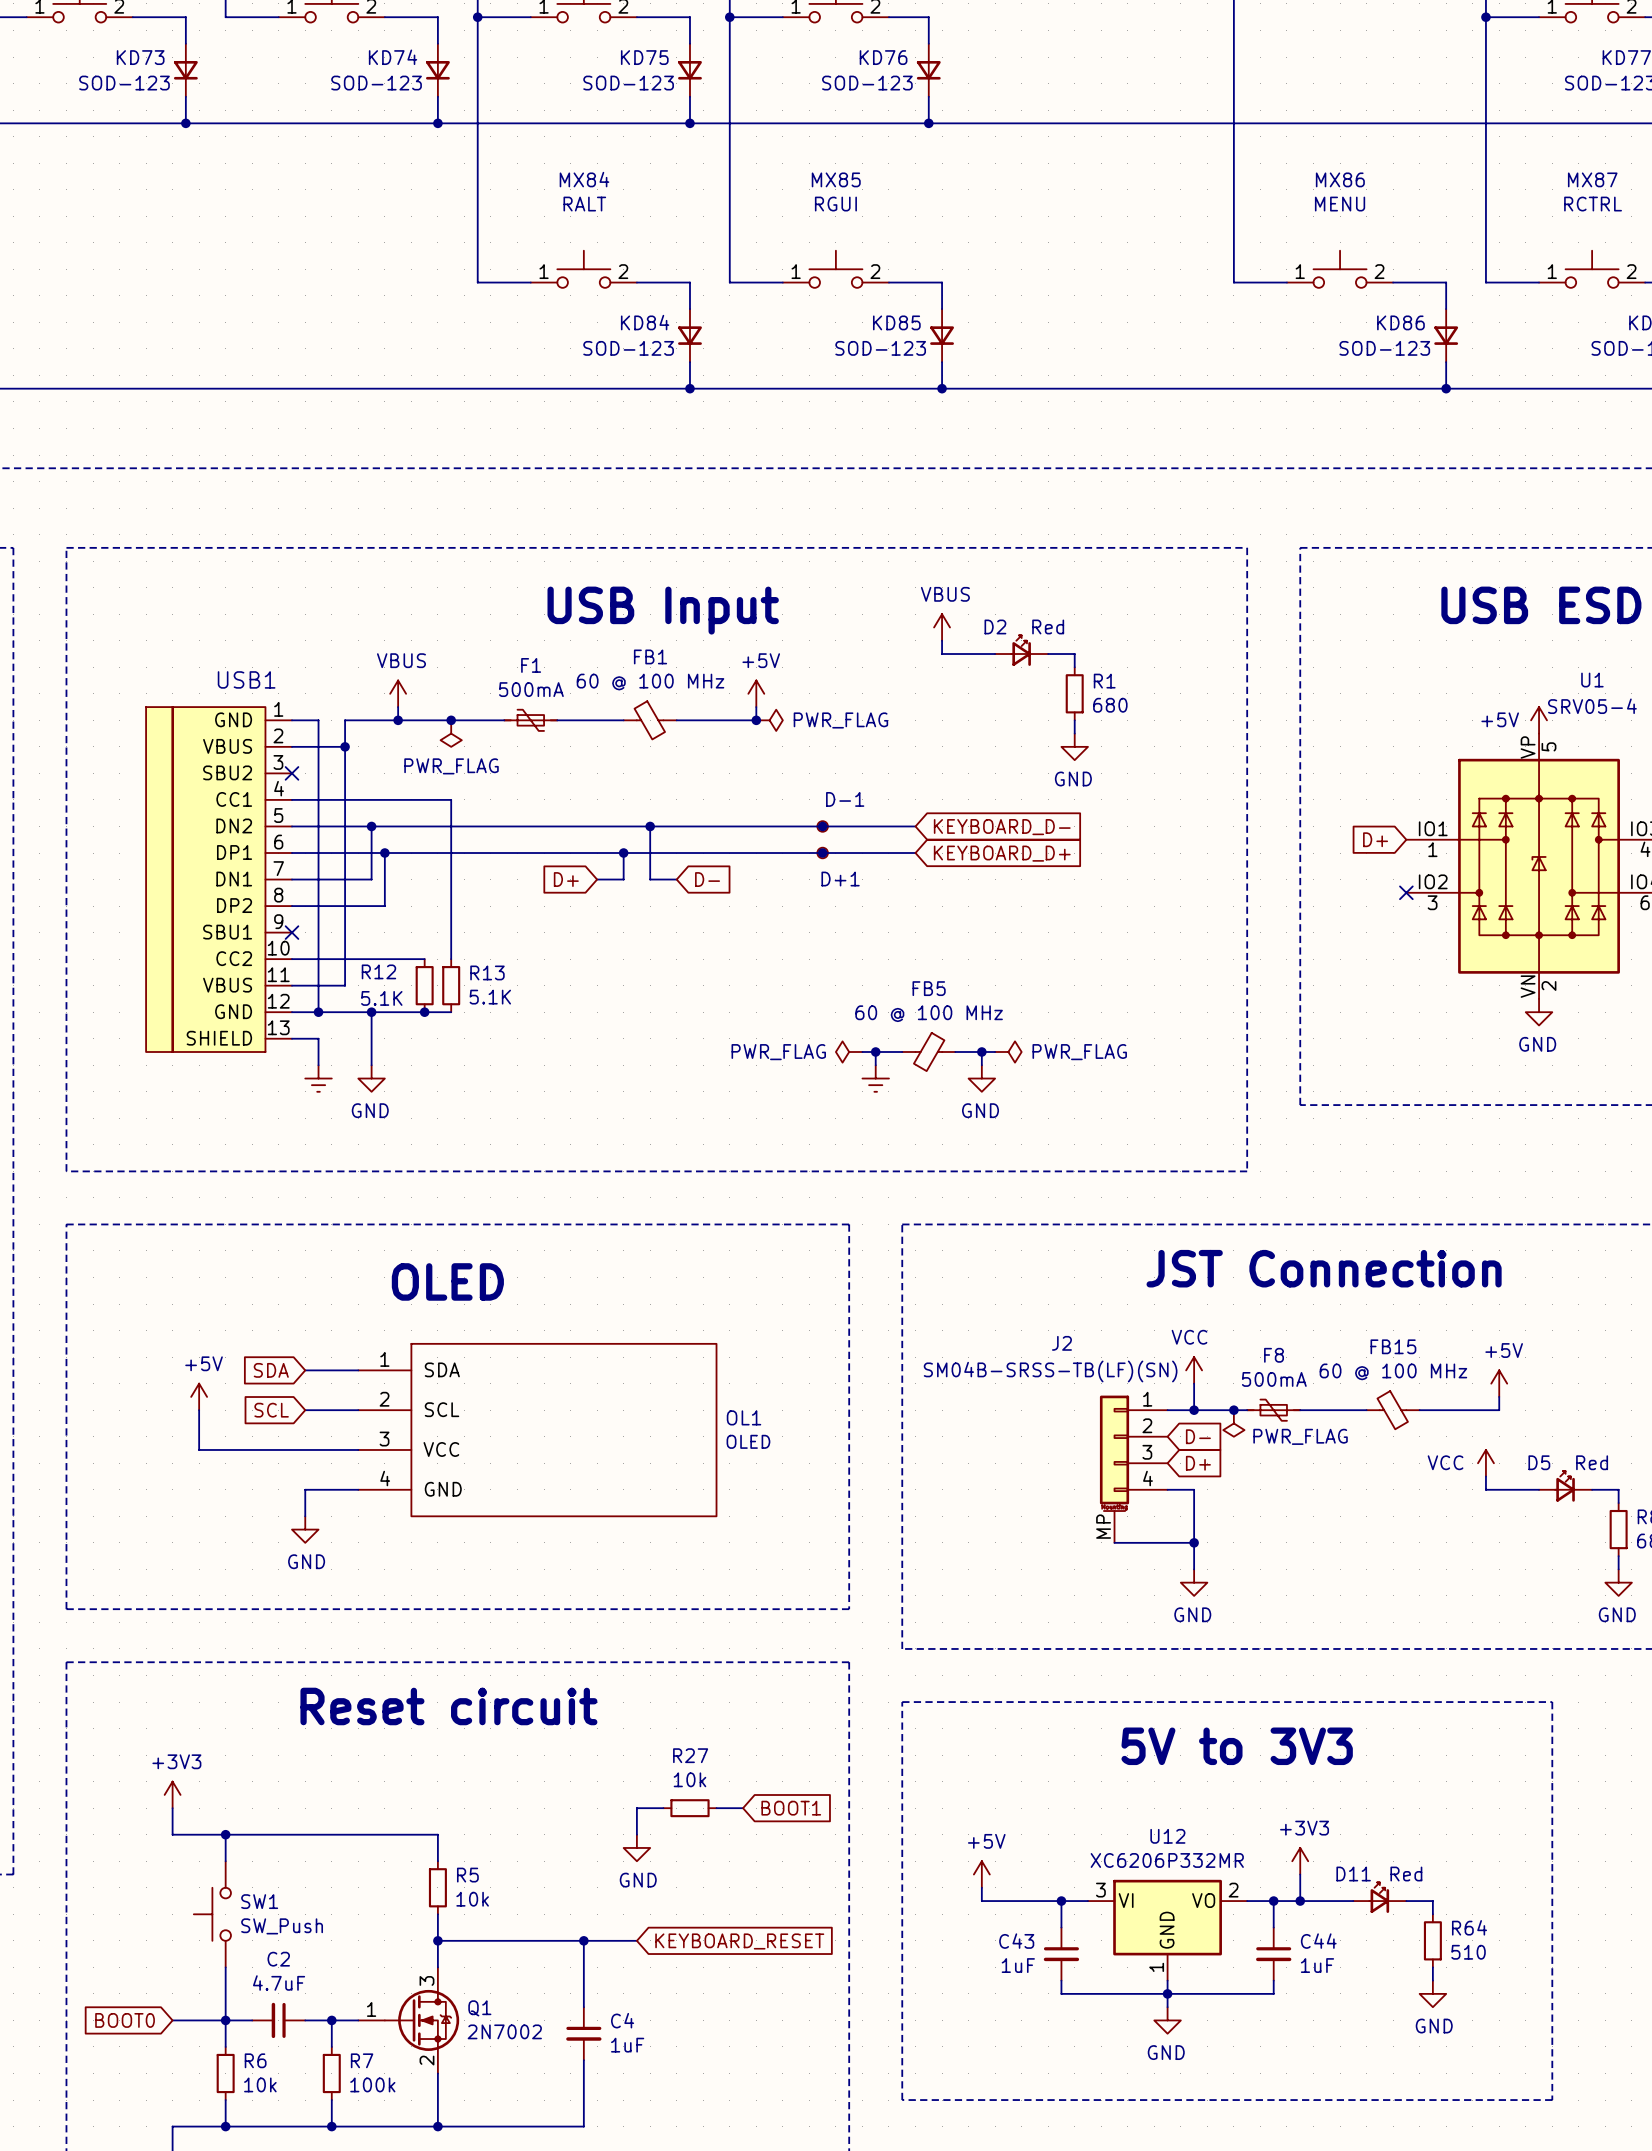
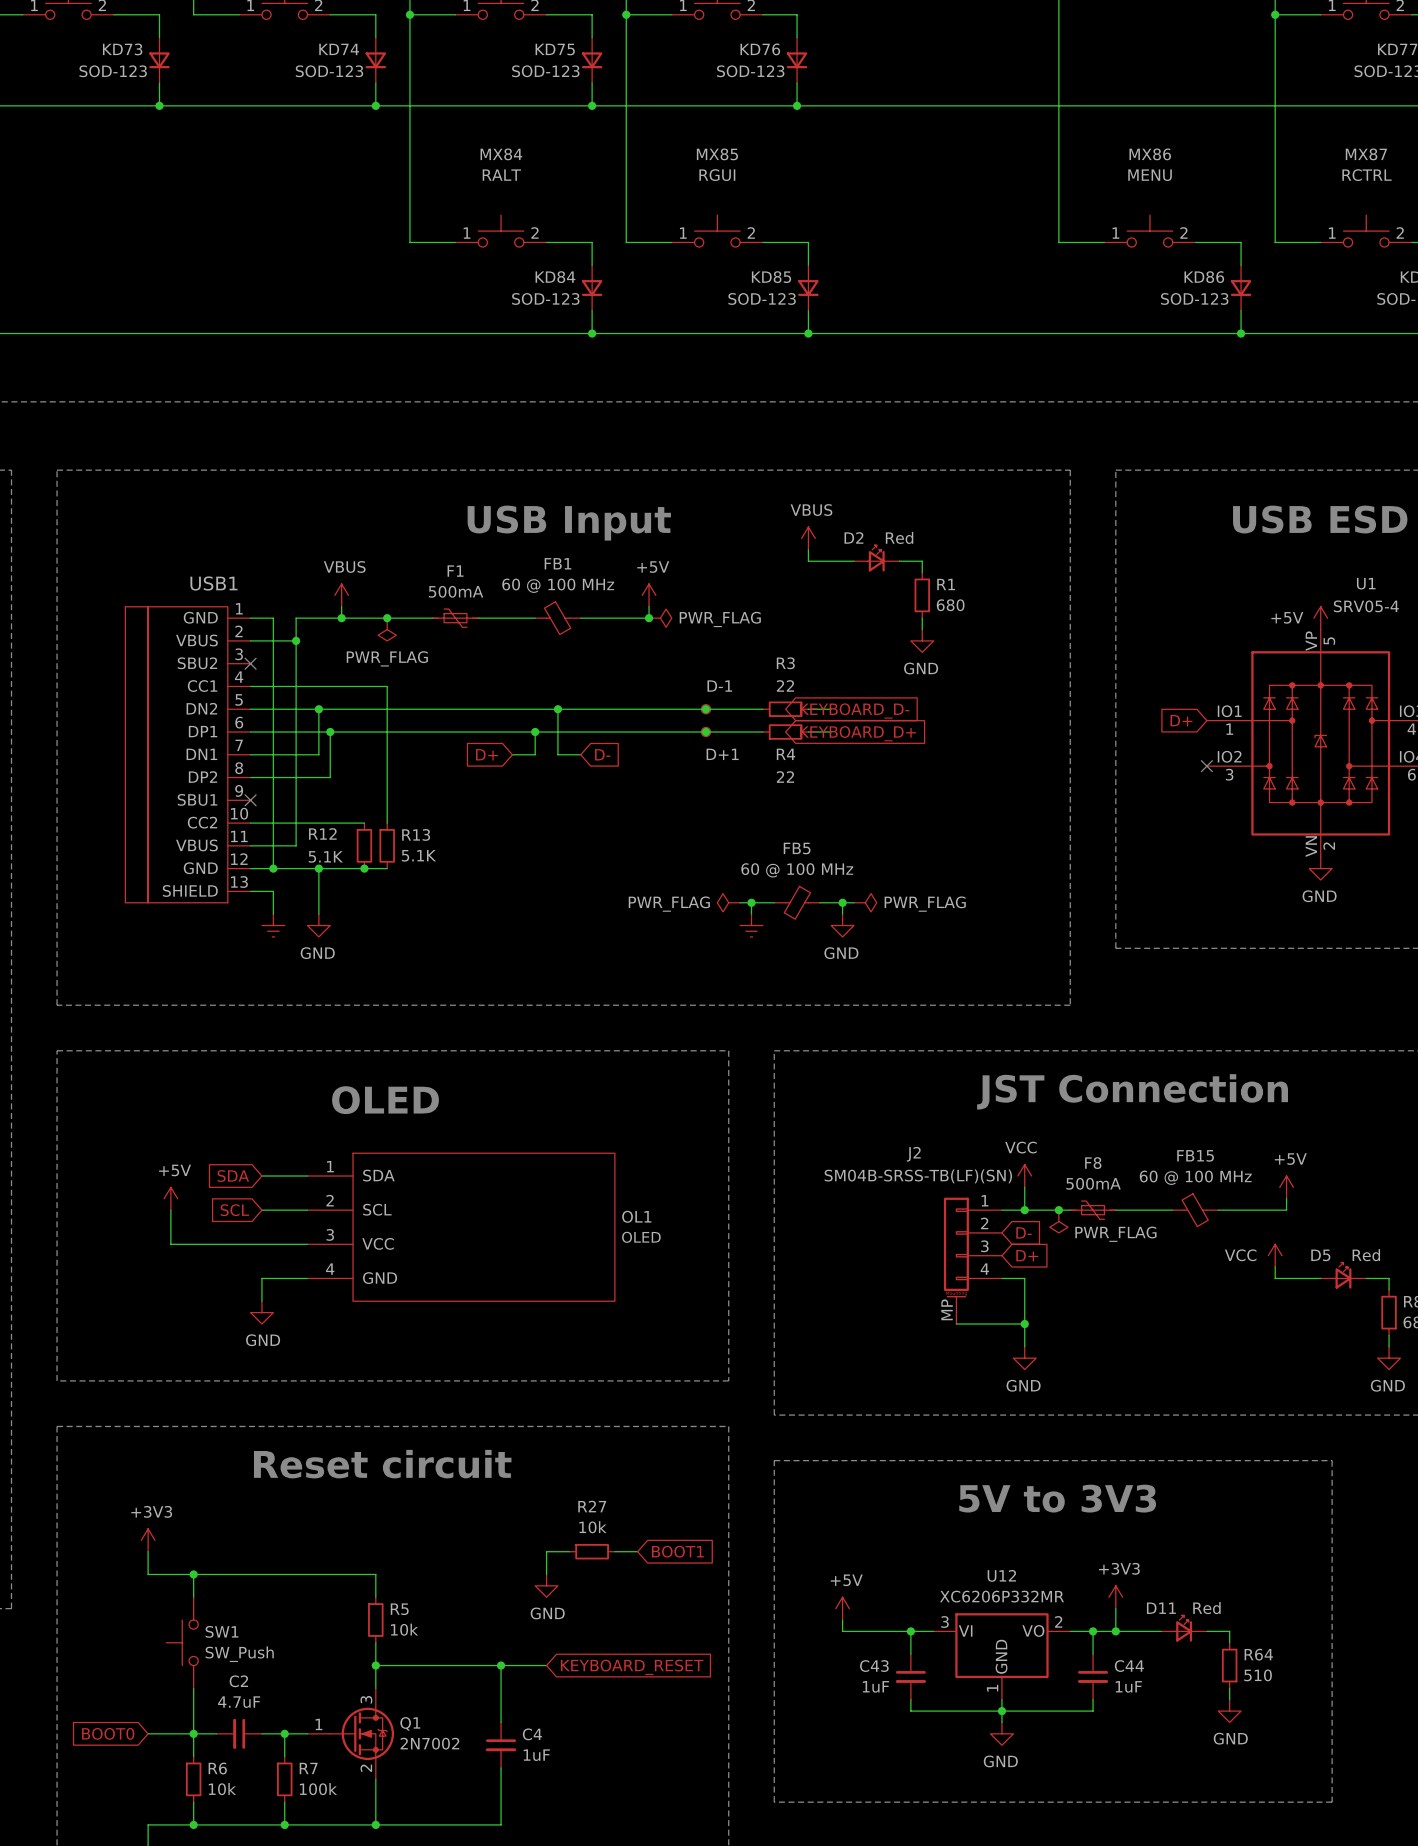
wire: (888, 826) (915, 826) -> (808, 709) (831, 709)
R3: none -> 22 (785, 709)
wire: (888, 853) (915, 853) -> (808, 732) (831, 732)
R4: none -> 22 (785, 732)

